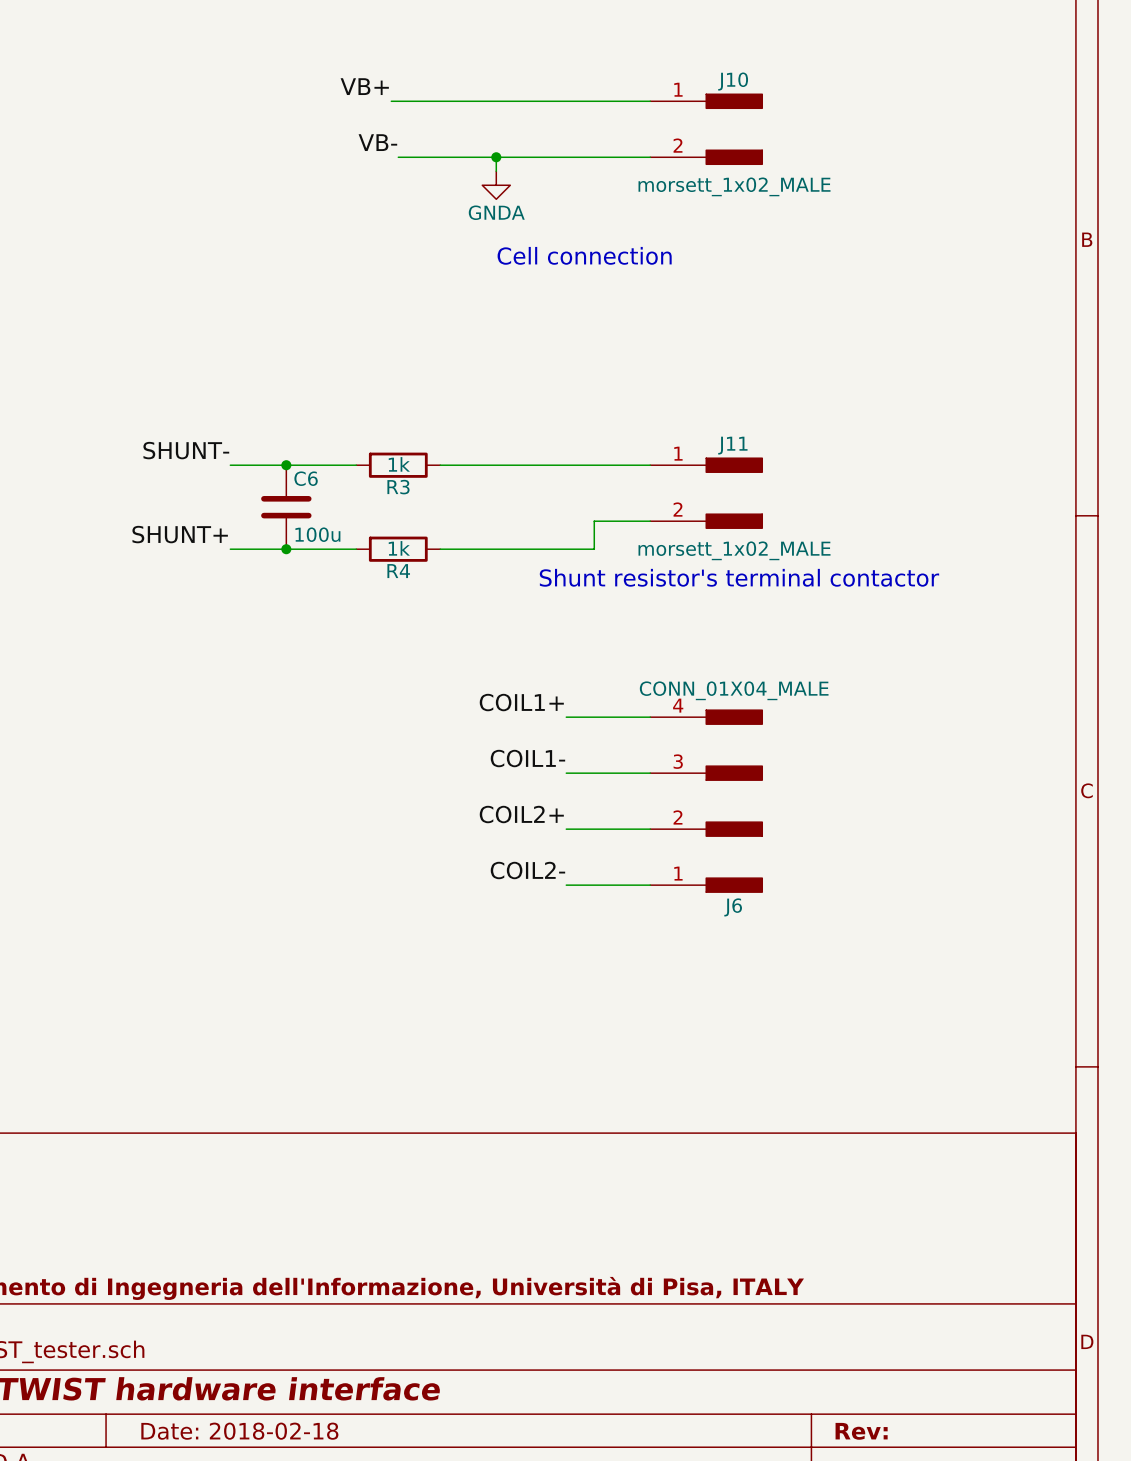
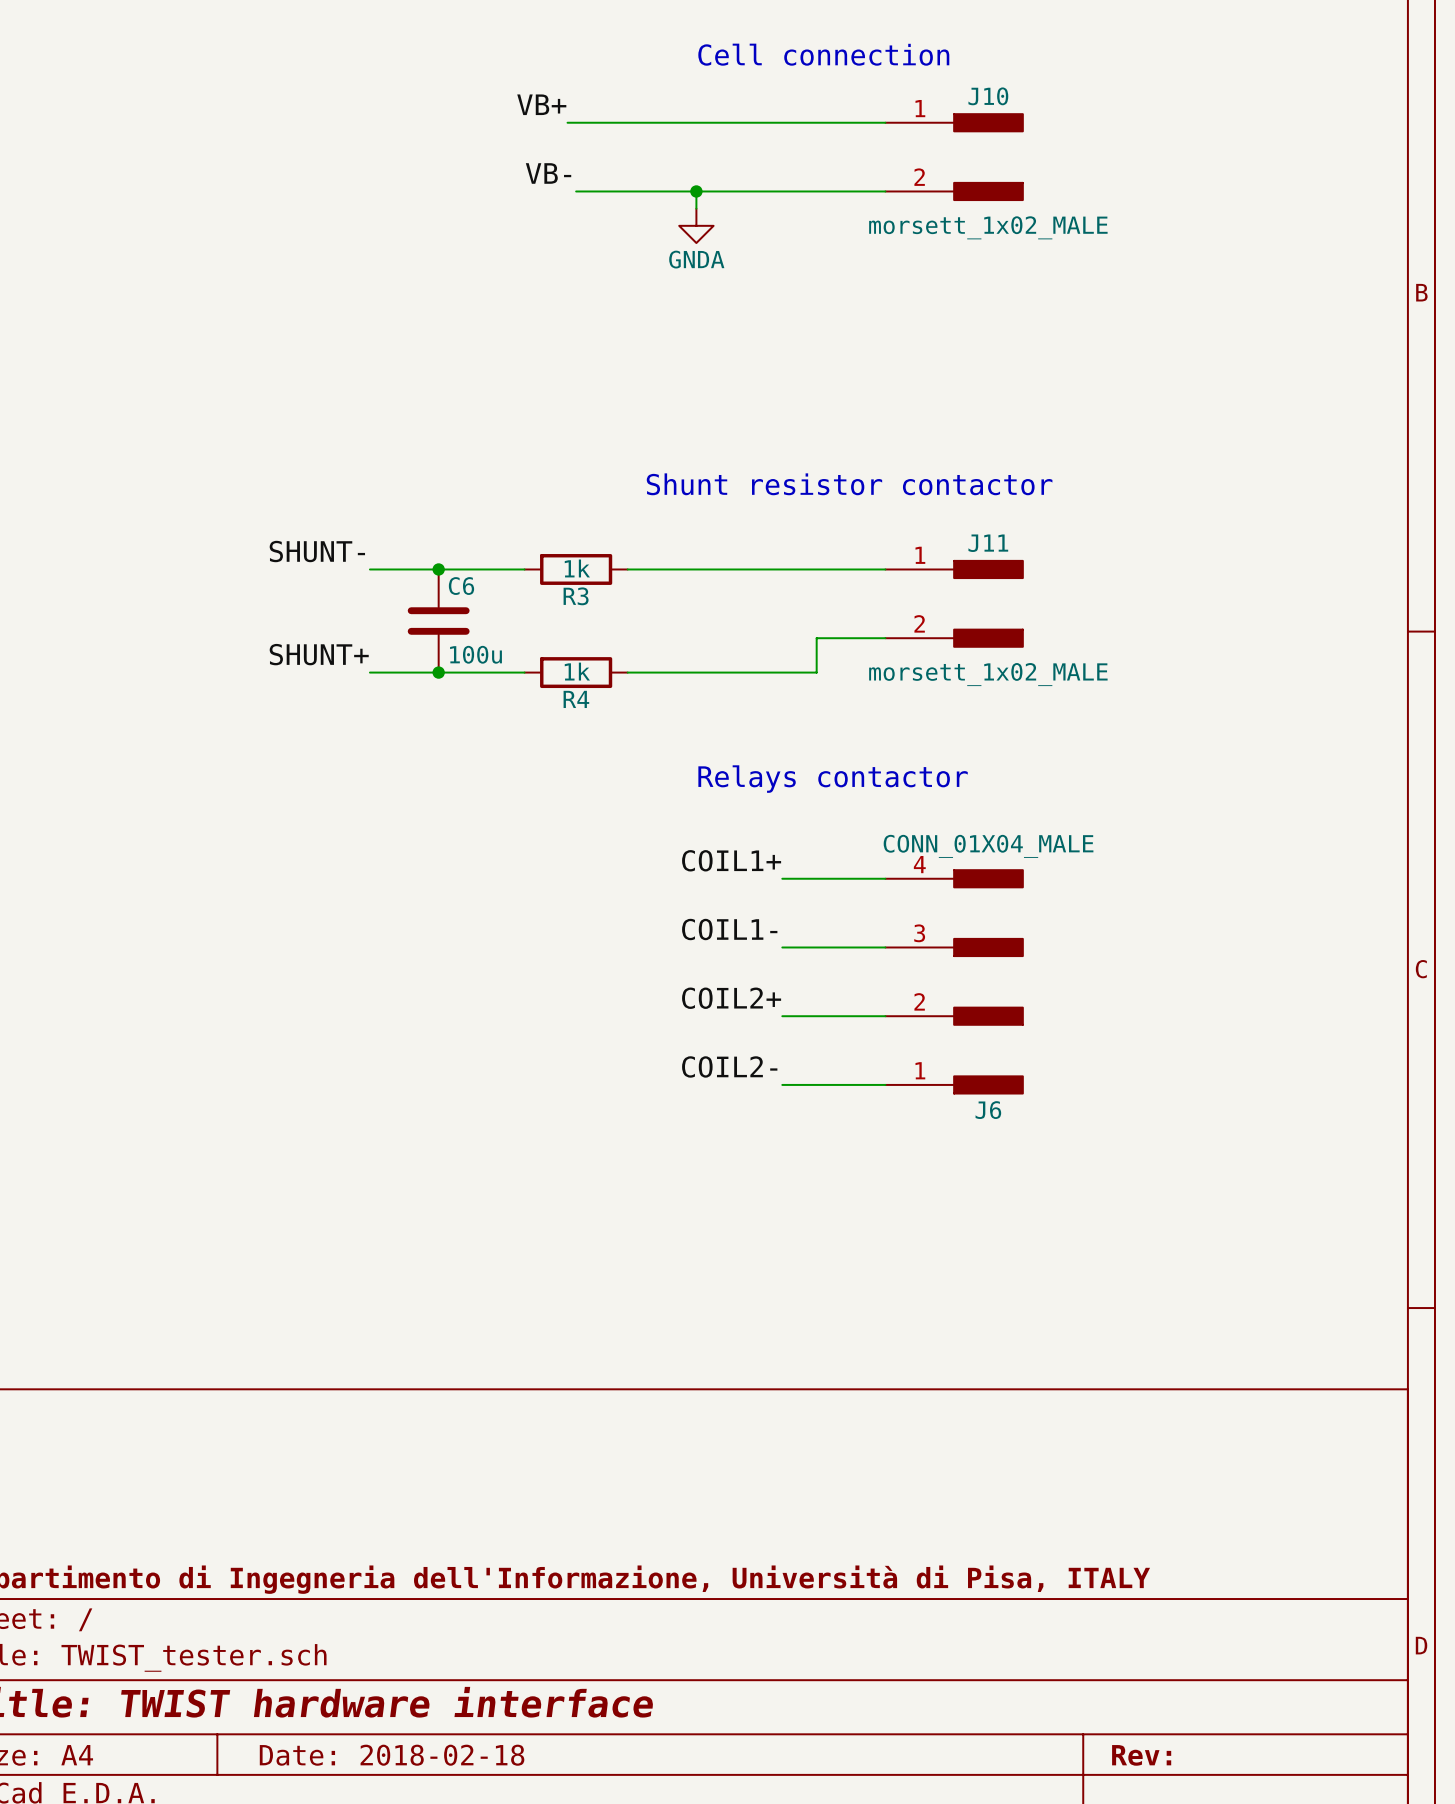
text position: Cell connection (584, 255) -> Cell connection (823, 54)
text: none -> Shunt resistor contactor (849, 484)
text: Shunt resistor's terminal contactor (739, 577) -> none
text: none -> Relays contactor (833, 779)

